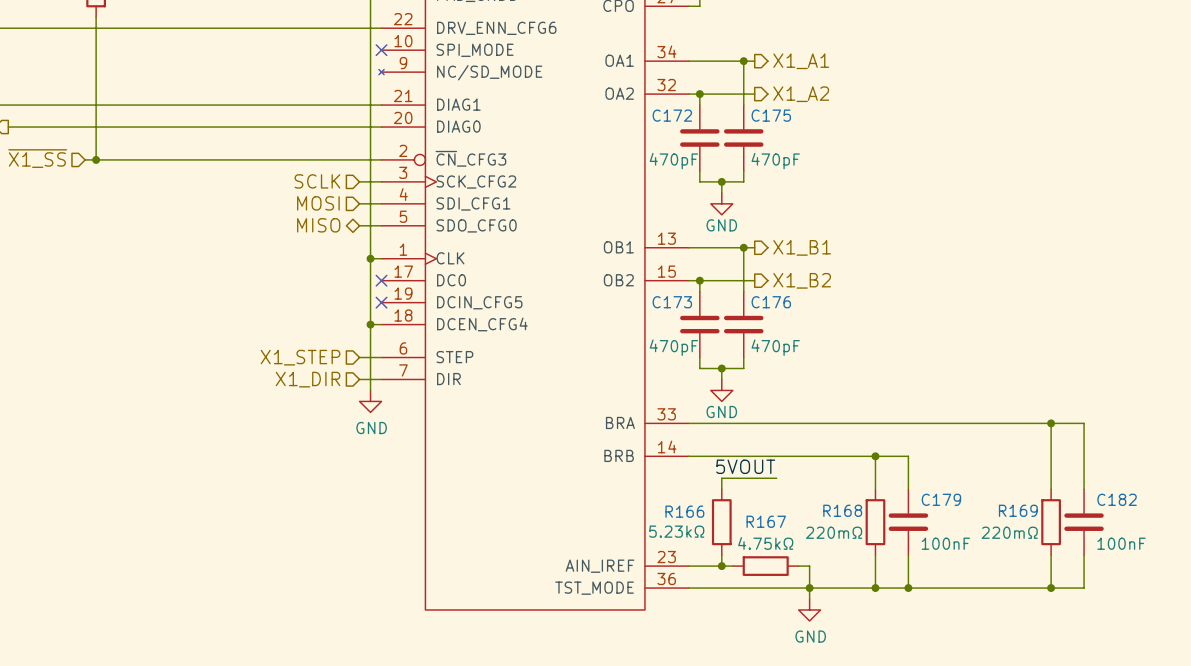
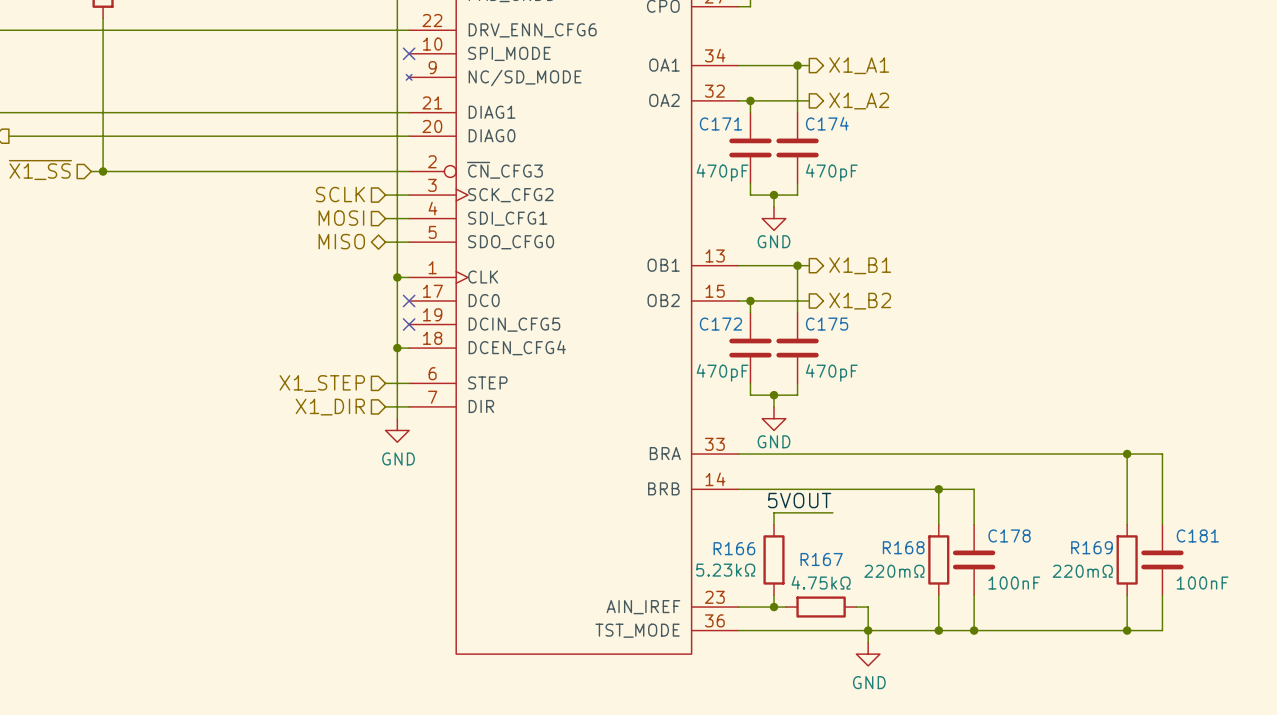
C172 name: C172 (672, 115) -> C171 (720, 123)
C175 name: C175 (771, 115) -> C174 (827, 123)
C173 name: C173 (672, 302) -> C172 (720, 324)
C176 name: C176 (771, 302) -> C175 (827, 324)
C179 name: C179 (941, 499) -> C178 (1009, 535)
C182 name: C182 (1117, 499) -> C181 (1197, 535)

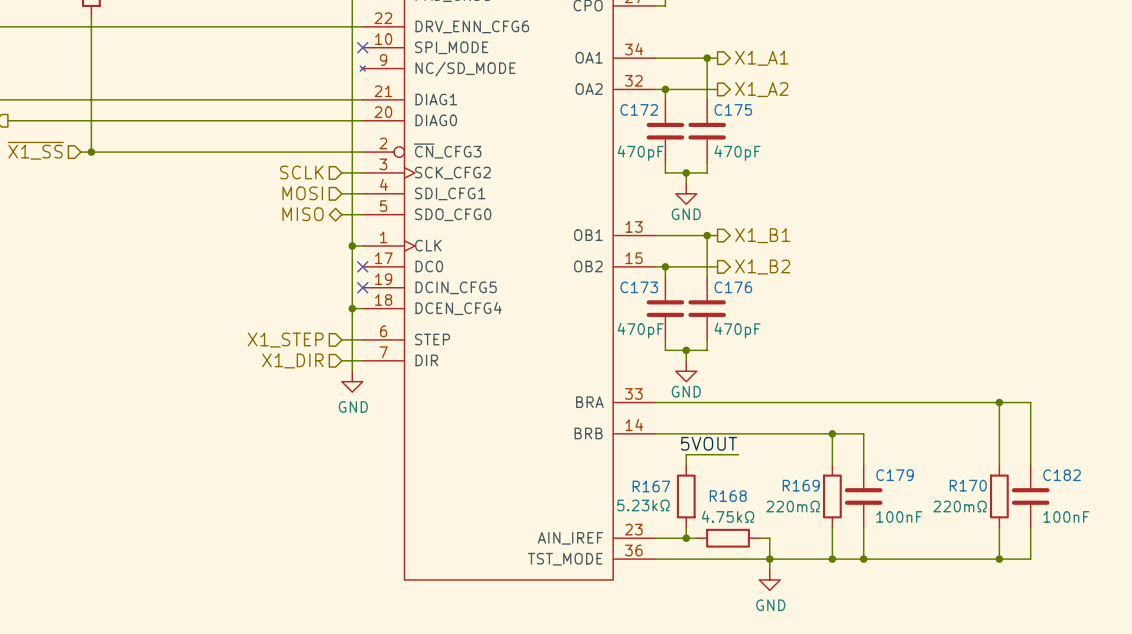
C171 name: C171 (720, 123) -> C172 (639, 109)
C174 name: C174 (827, 123) -> C175 (733, 109)
C172 name: C172 (720, 324) -> C173 (639, 287)
C175 name: C175 (827, 324) -> C176 (733, 287)
C178 name: C178 (1009, 535) -> C179 (895, 475)
C181 name: C181 (1197, 535) -> C182 (1062, 475)
R168 name: R168 (903, 547) -> R169 (801, 485)
R169 name: R169 (1092, 547) -> R170 (968, 485)
R166 name: R166 (734, 548) -> R167 (651, 486)
R167 name: R167 (821, 559) -> R168 (728, 496)

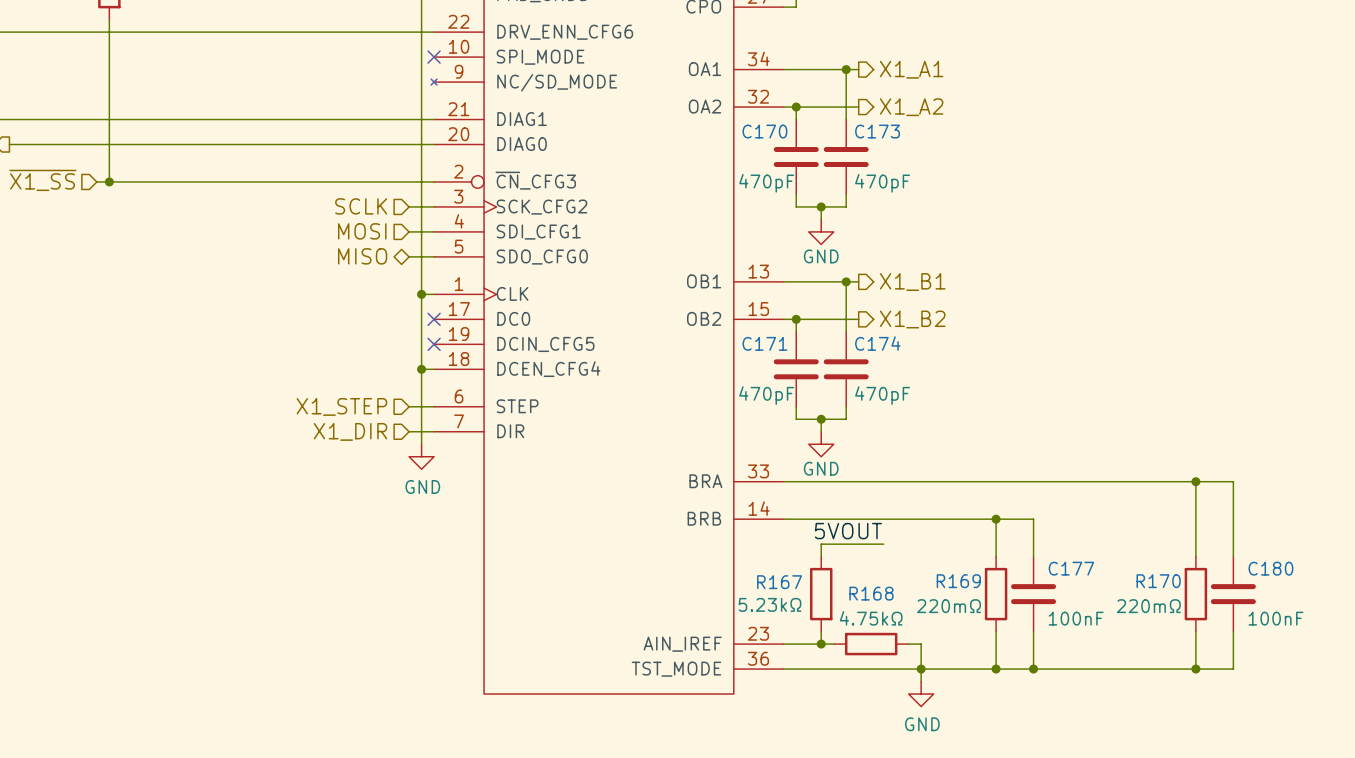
C172 name: C172 (639, 109) -> C170 (764, 131)
C175 name: C175 (733, 109) -> C173 (877, 131)
C173 name: C173 (639, 287) -> C171 (764, 343)
C176 name: C176 (733, 287) -> C174 (877, 343)
C179 name: C179 (895, 475) -> C177 (1071, 568)
C182 name: C182 (1062, 475) -> C180 (1270, 568)

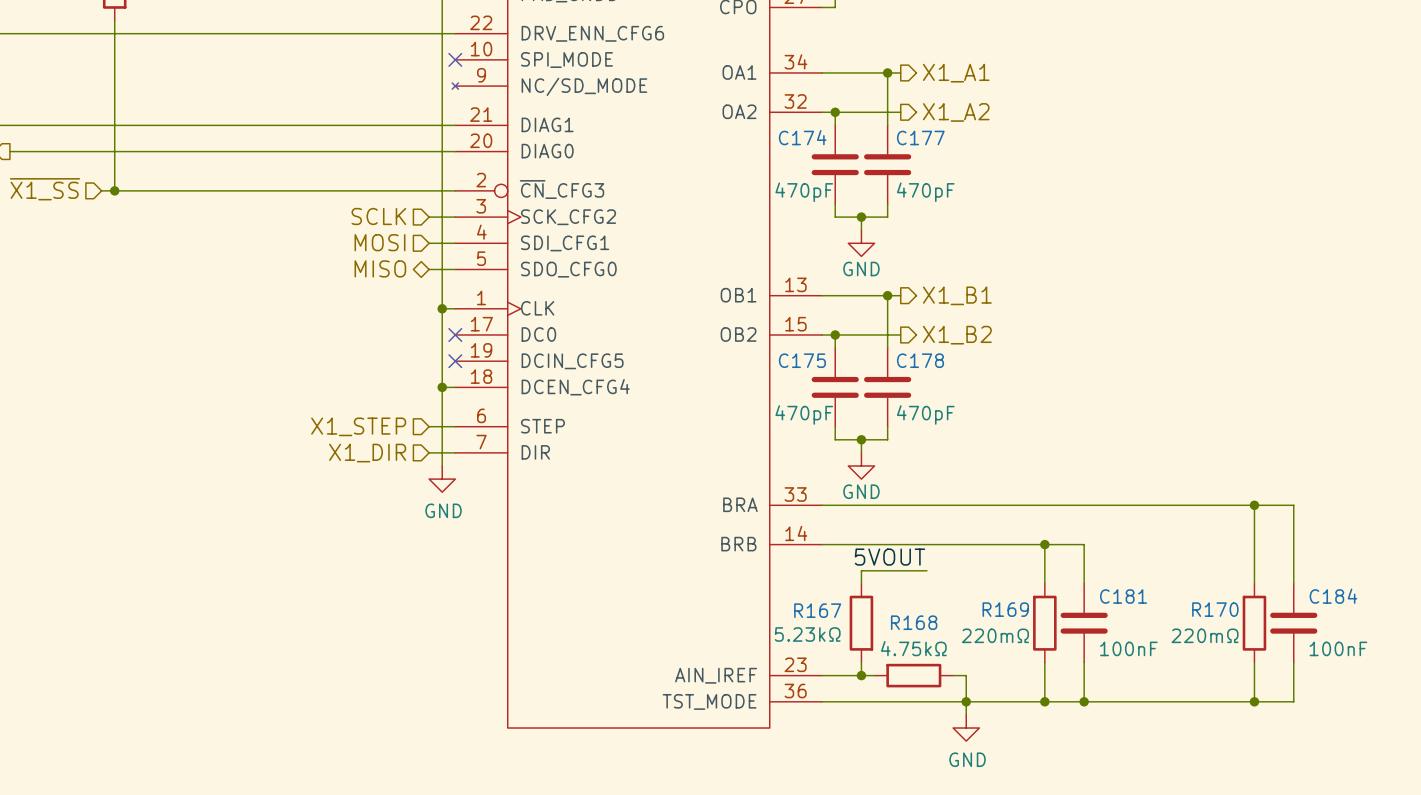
C170 name: C170 (764, 131) -> C174 (802, 137)
C173 name: C173 (877, 131) -> C177 (920, 137)
C171 name: C171 (764, 343) -> C175 (802, 360)
C174 name: C174 (877, 343) -> C178 (920, 360)
C177 name: C177 (1071, 568) -> C181 (1123, 596)
C180 name: C180 (1270, 568) -> C184 (1333, 596)

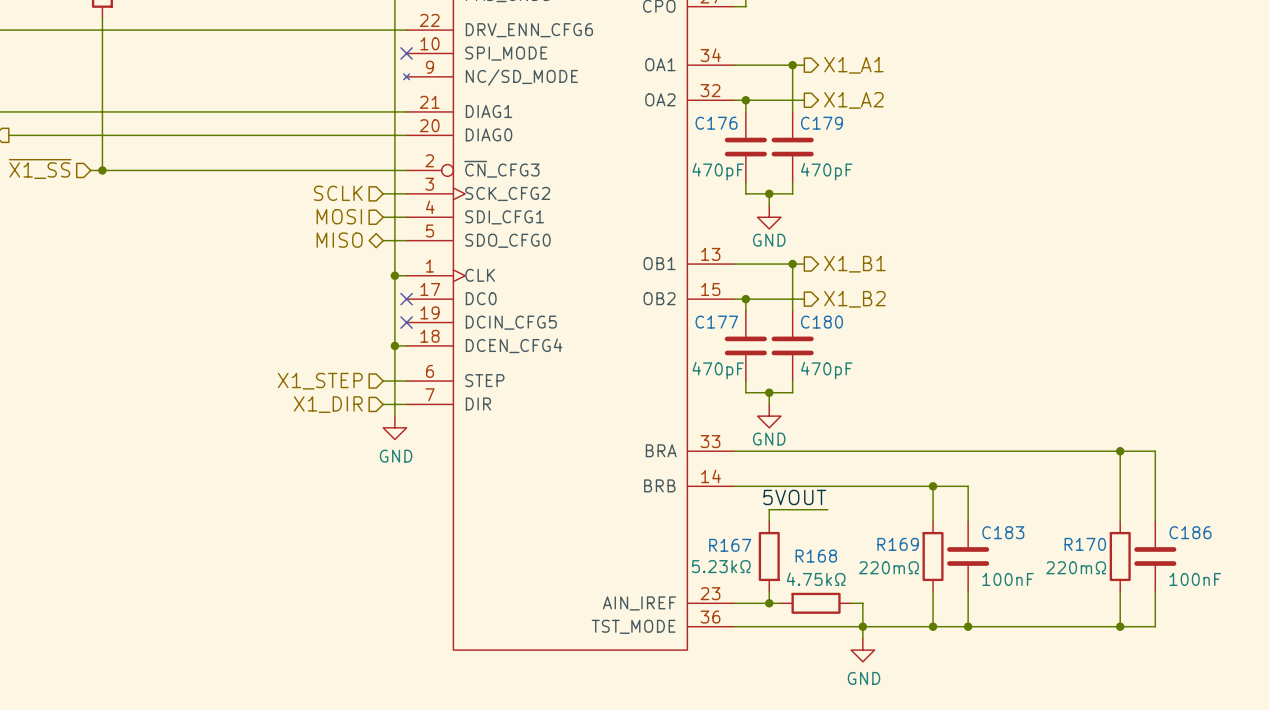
C174 name: C174 (802, 137) -> C176 (716, 123)
C177 name: C177 (920, 137) -> C179 (821, 123)
C175 name: C175 (802, 360) -> C177 (716, 322)
C178 name: C178 (920, 360) -> C180 (821, 322)
C181 name: C181 (1123, 596) -> C183 (1003, 532)
C184 name: C184 (1333, 596) -> C186 (1190, 532)

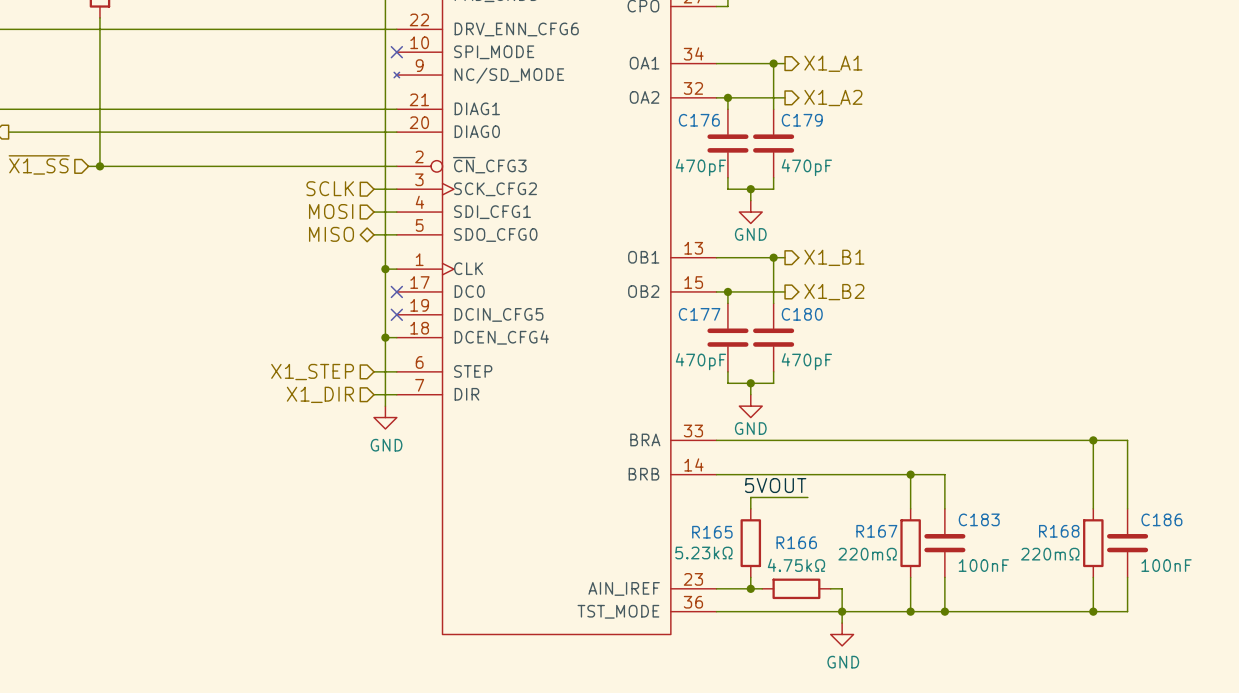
R169 name: R169 (898, 544) -> R167 (876, 531)
R170 name: R170 (1085, 544) -> R168 (1059, 531)
R167 name: R167 (730, 545) -> R165 (712, 532)
R168 name: R168 (816, 556) -> R166 (796, 542)

